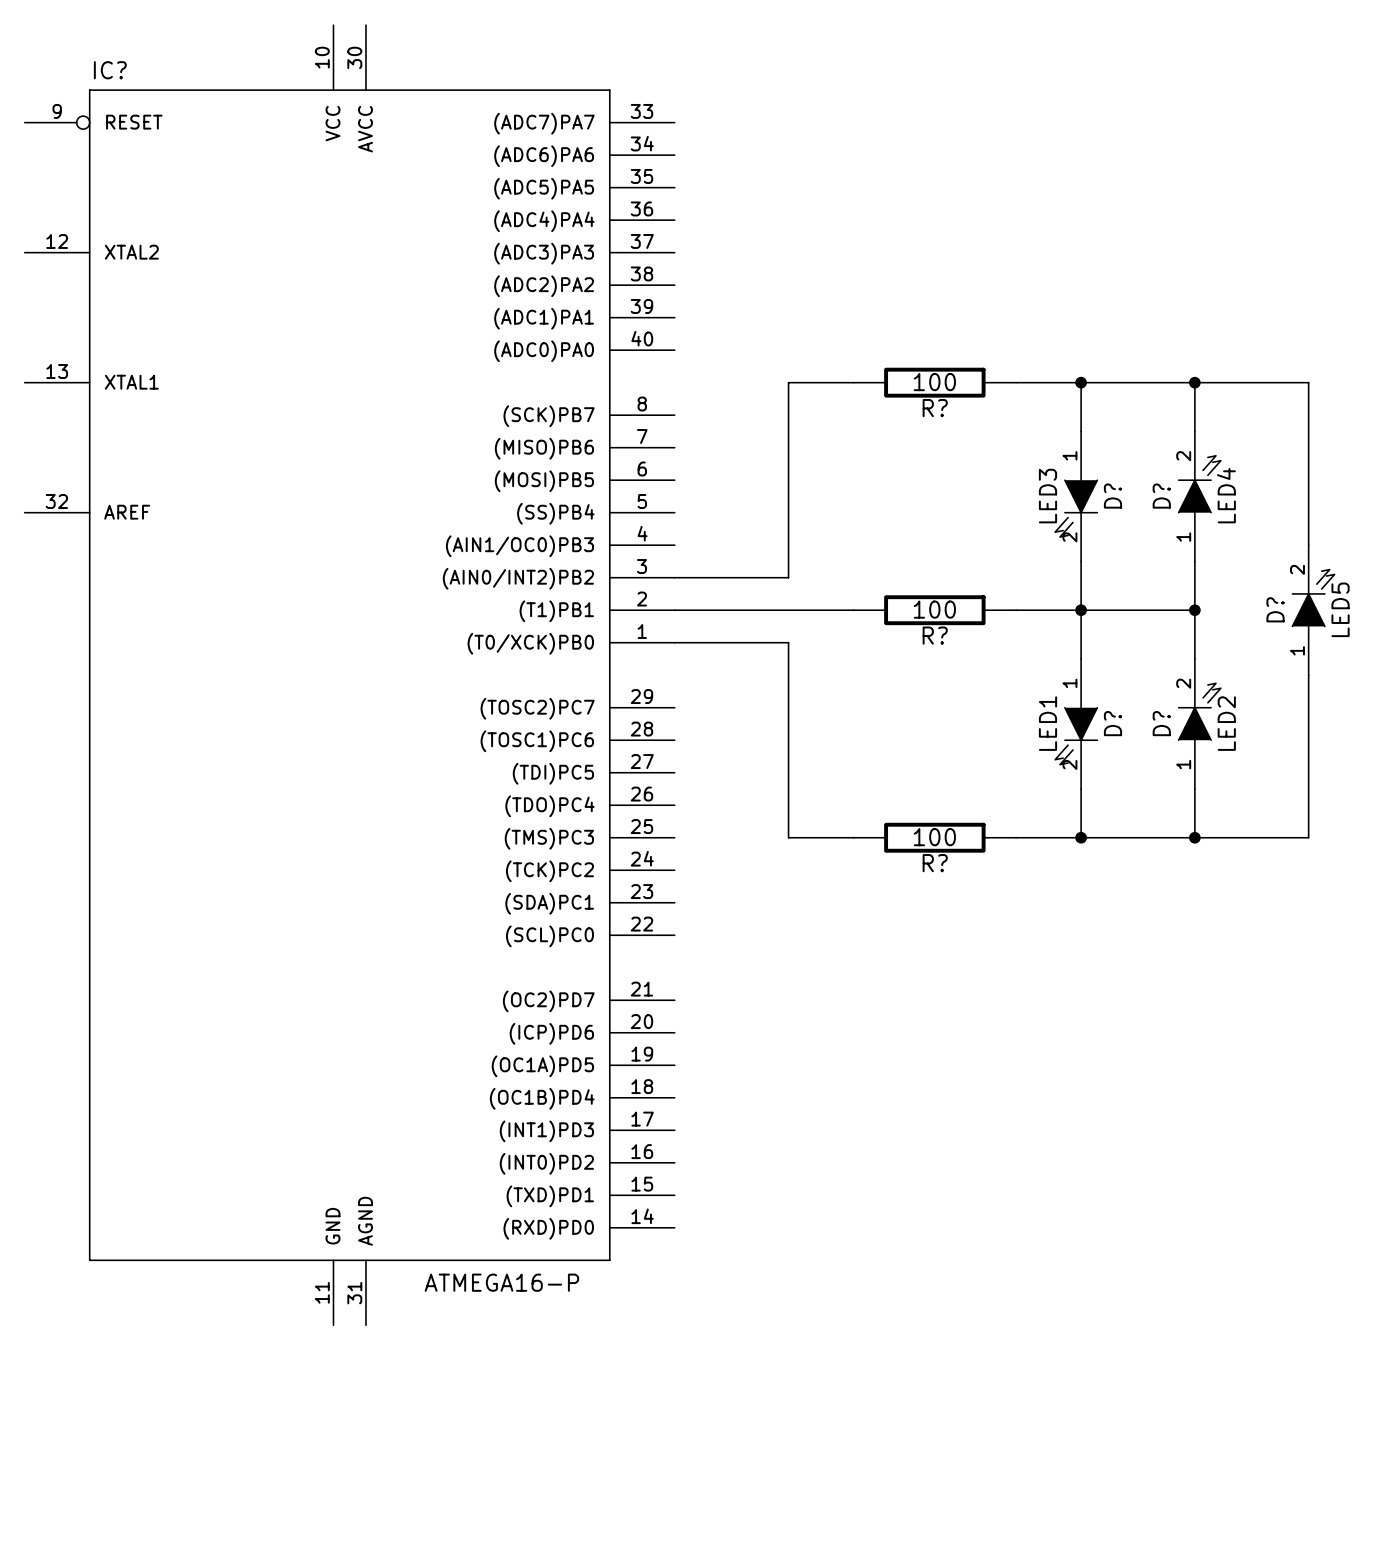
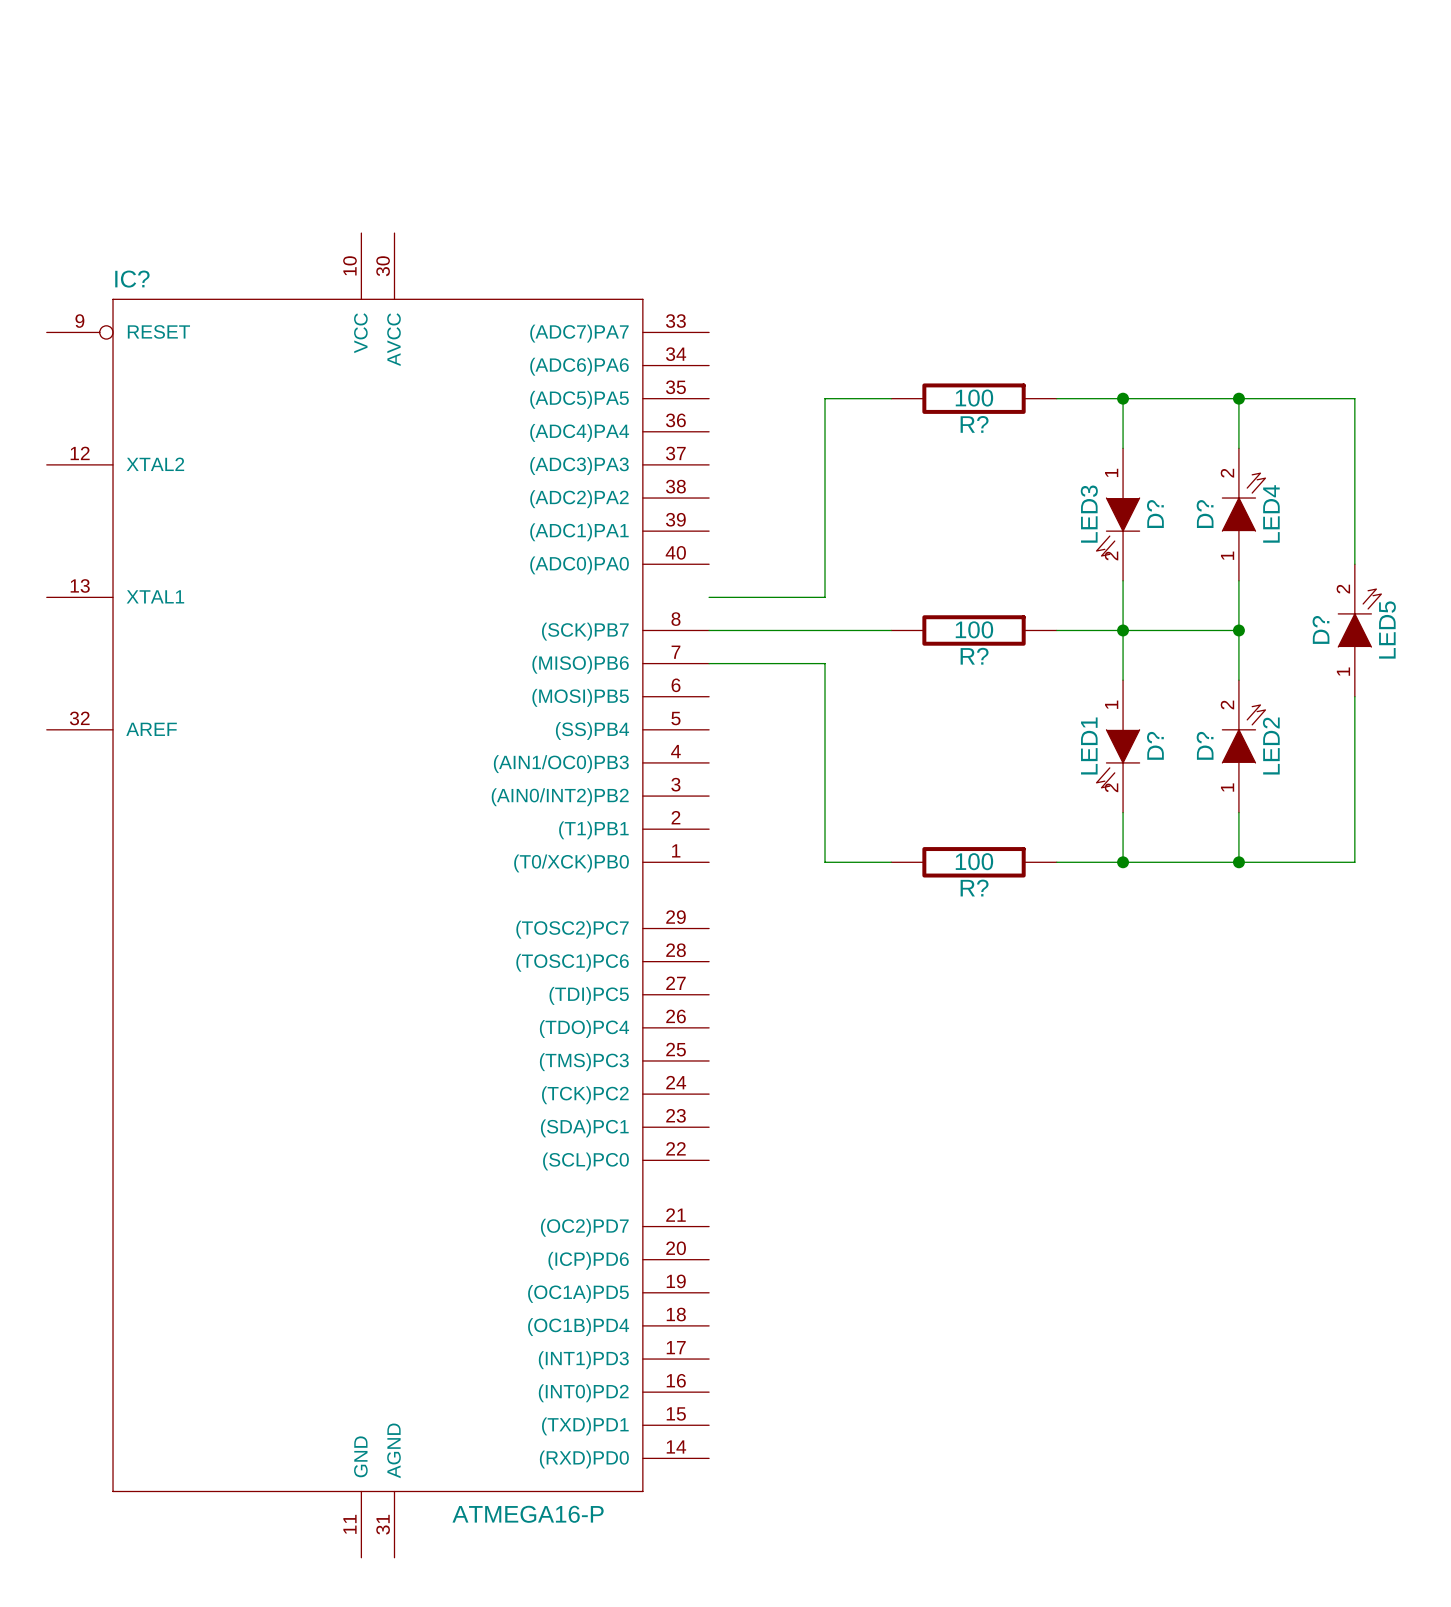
IC? position: (349, 675) -> (377, 895)

